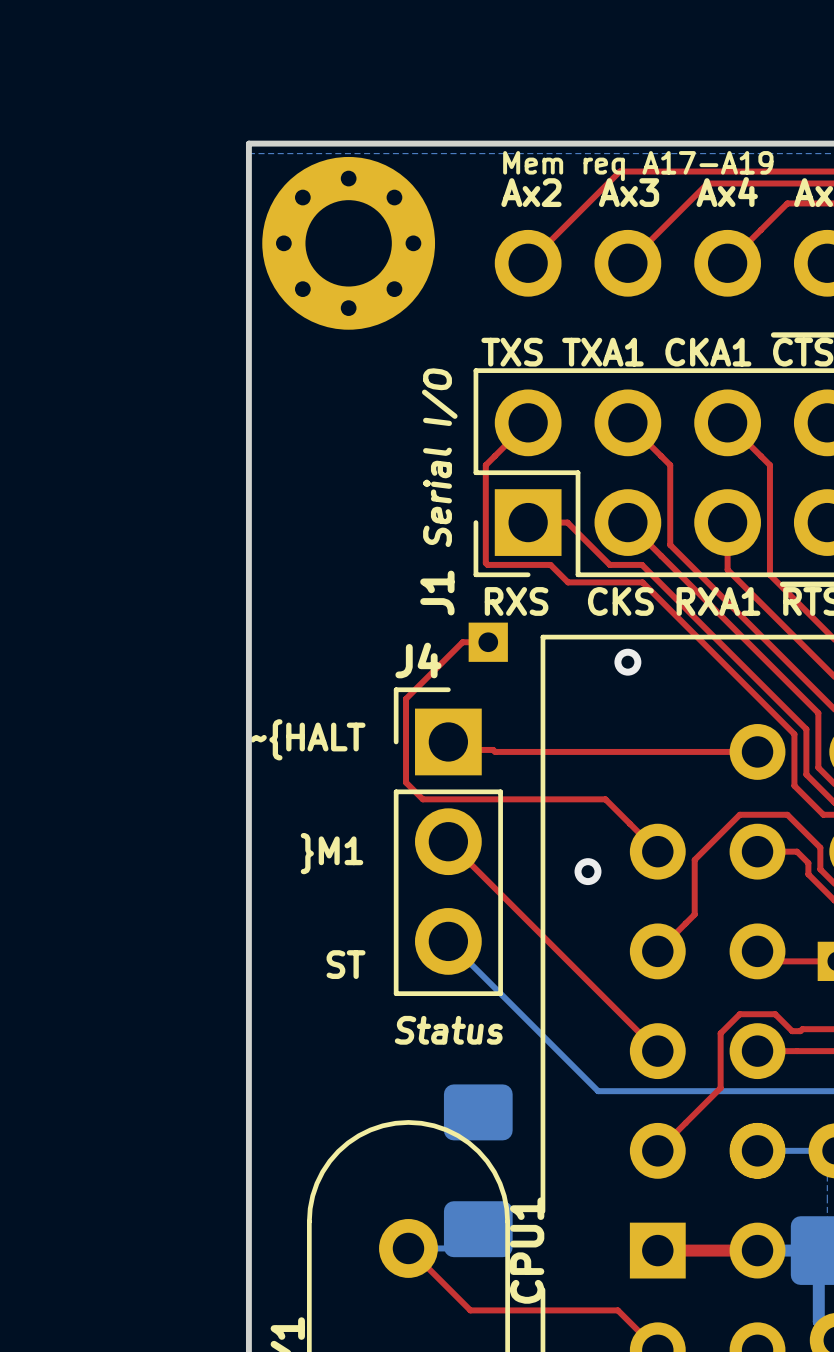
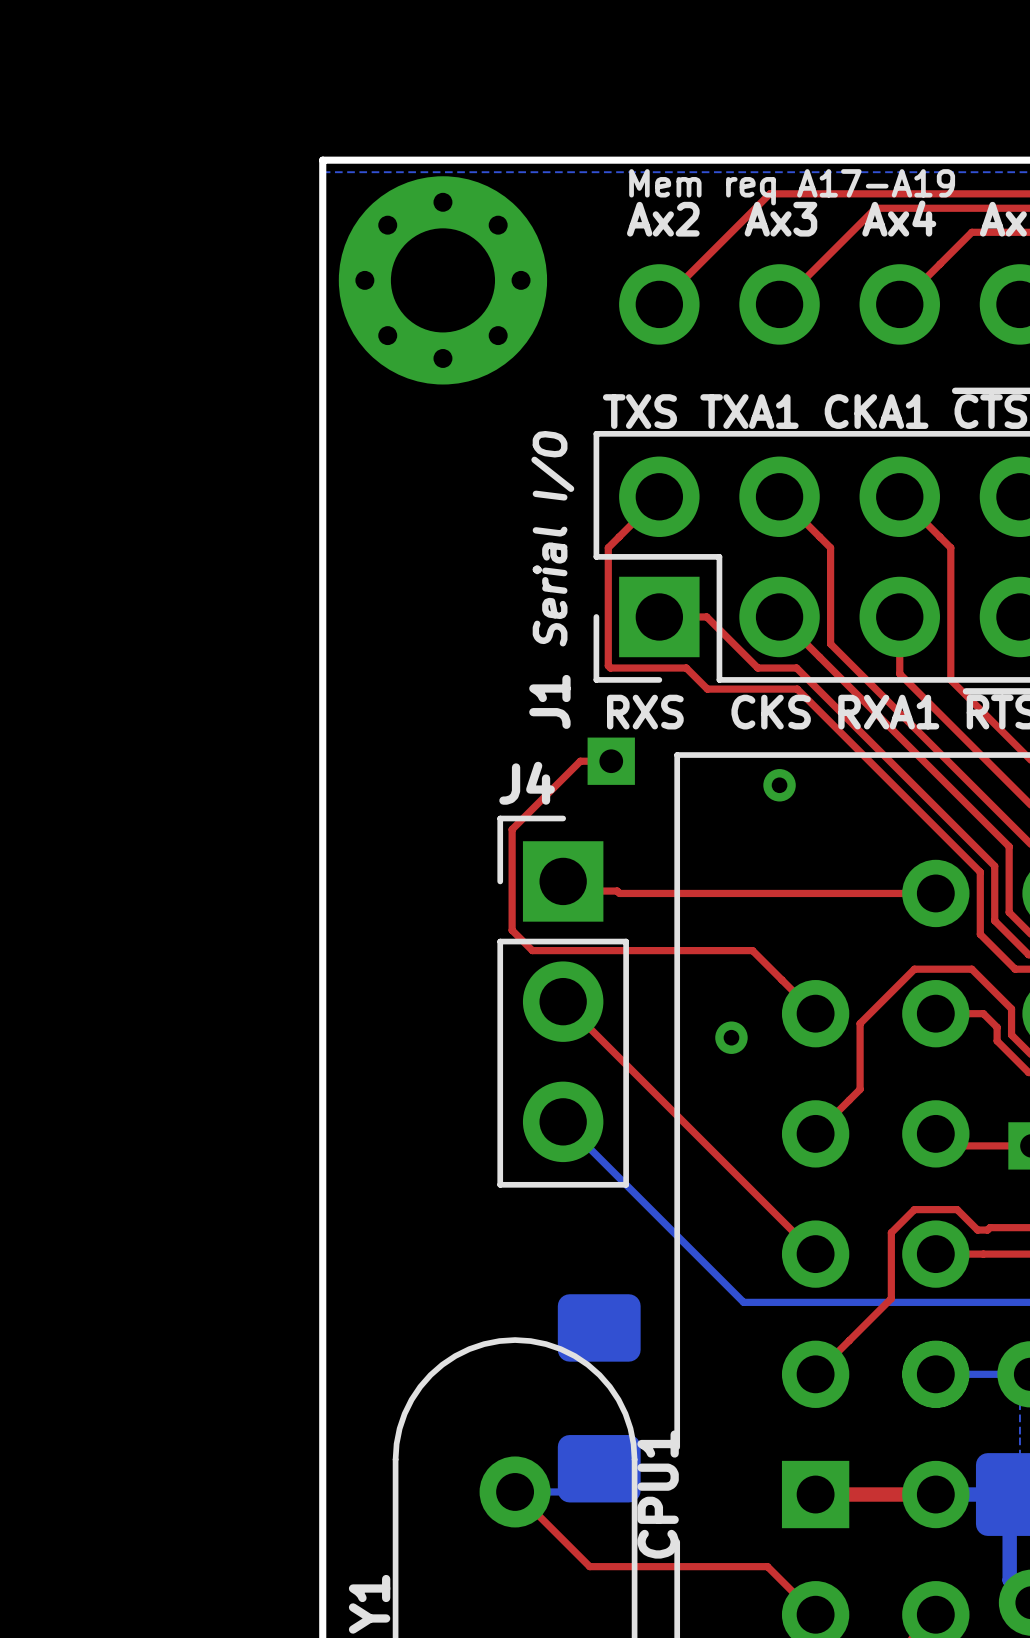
text: ~{HALT (307, 739) -> none
text: }M1 (332, 853) -> none
text: ST (346, 964) -> none
text: Status (448, 1030) -> none

